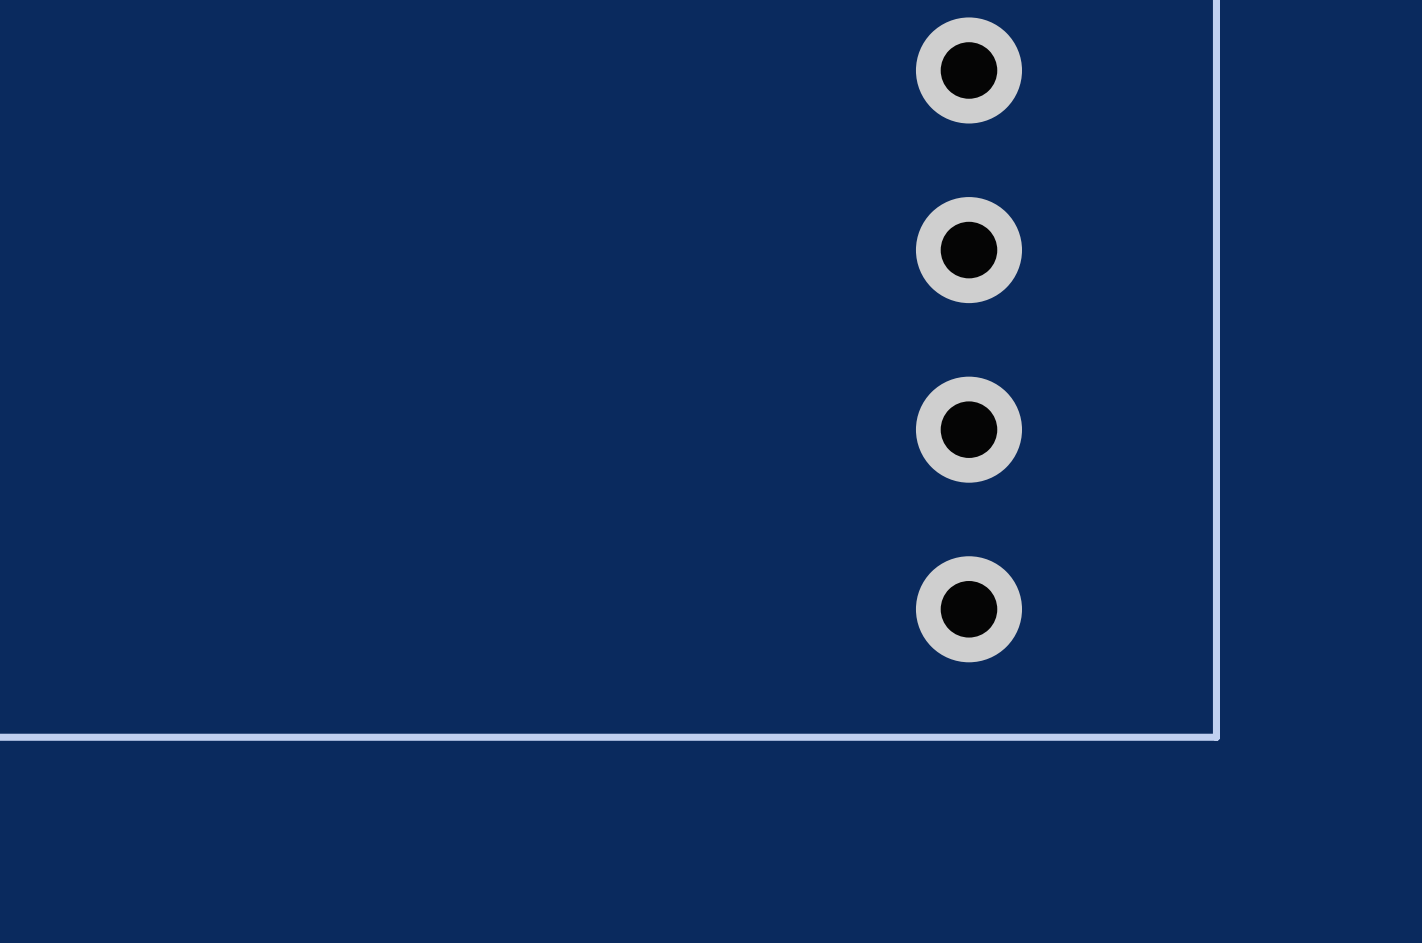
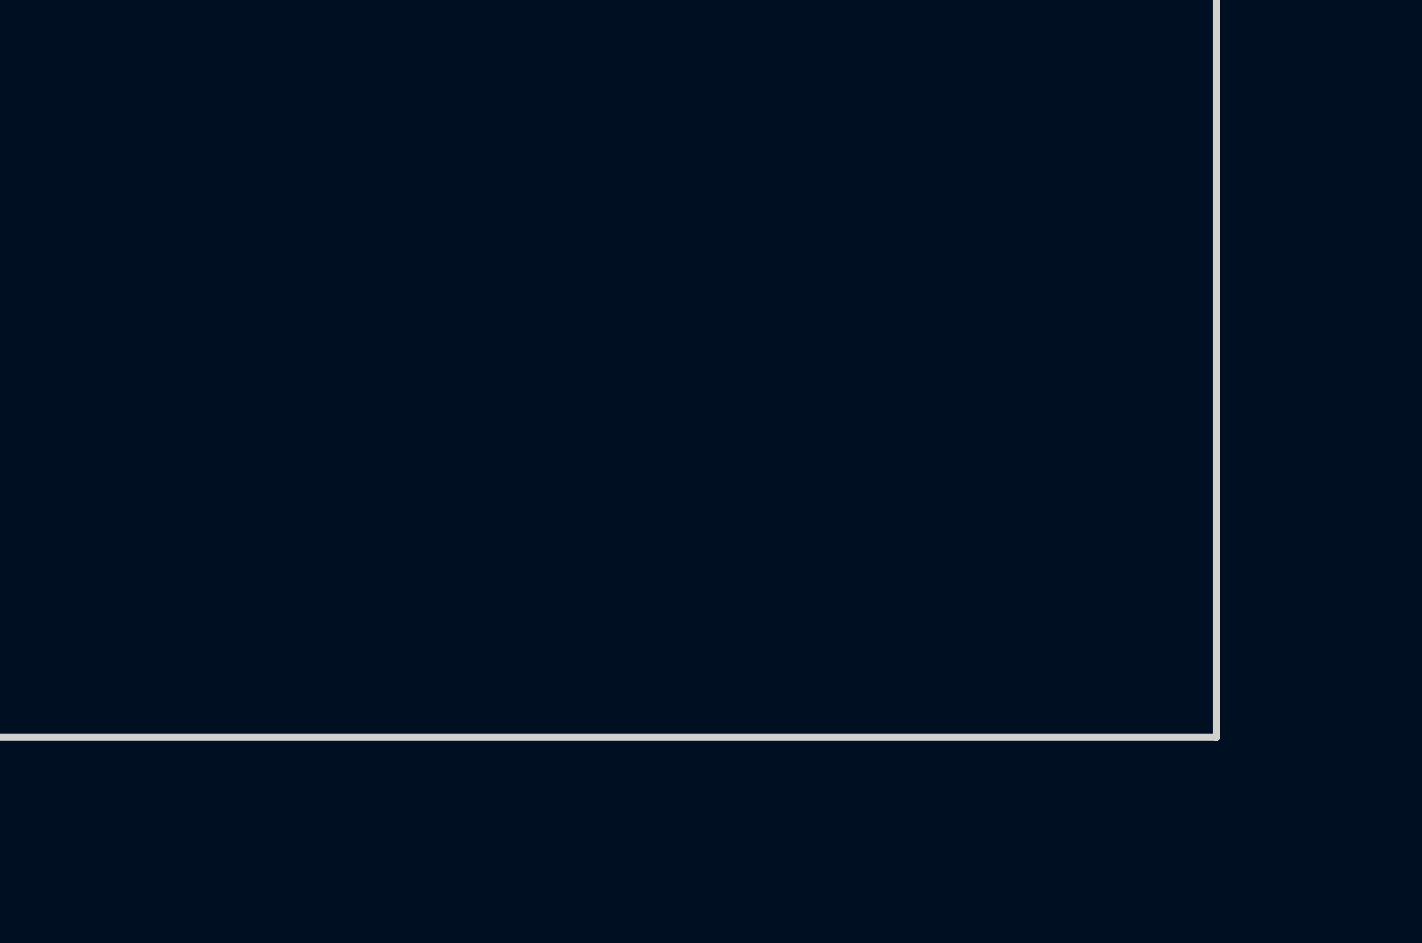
part: (968, 339) -> none

